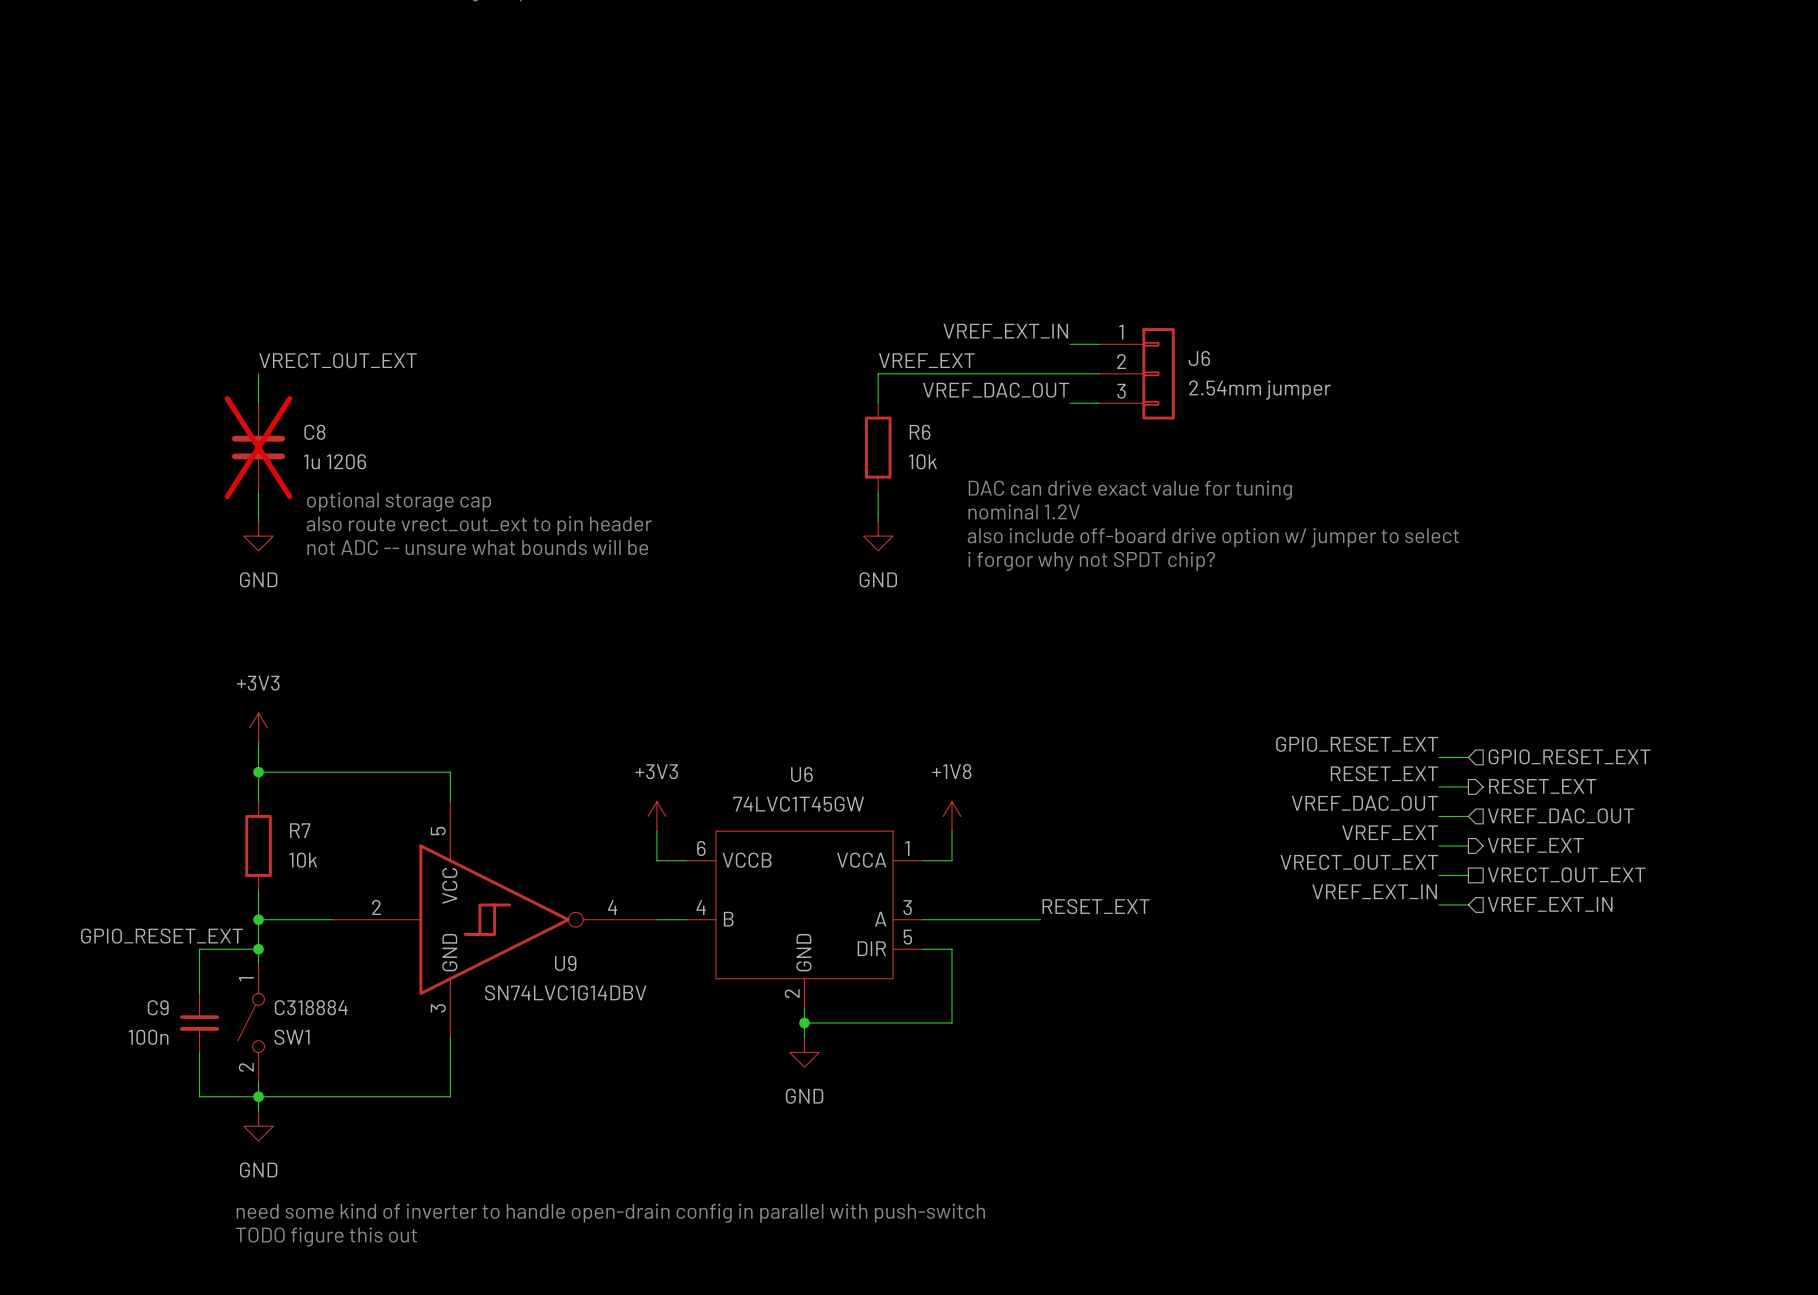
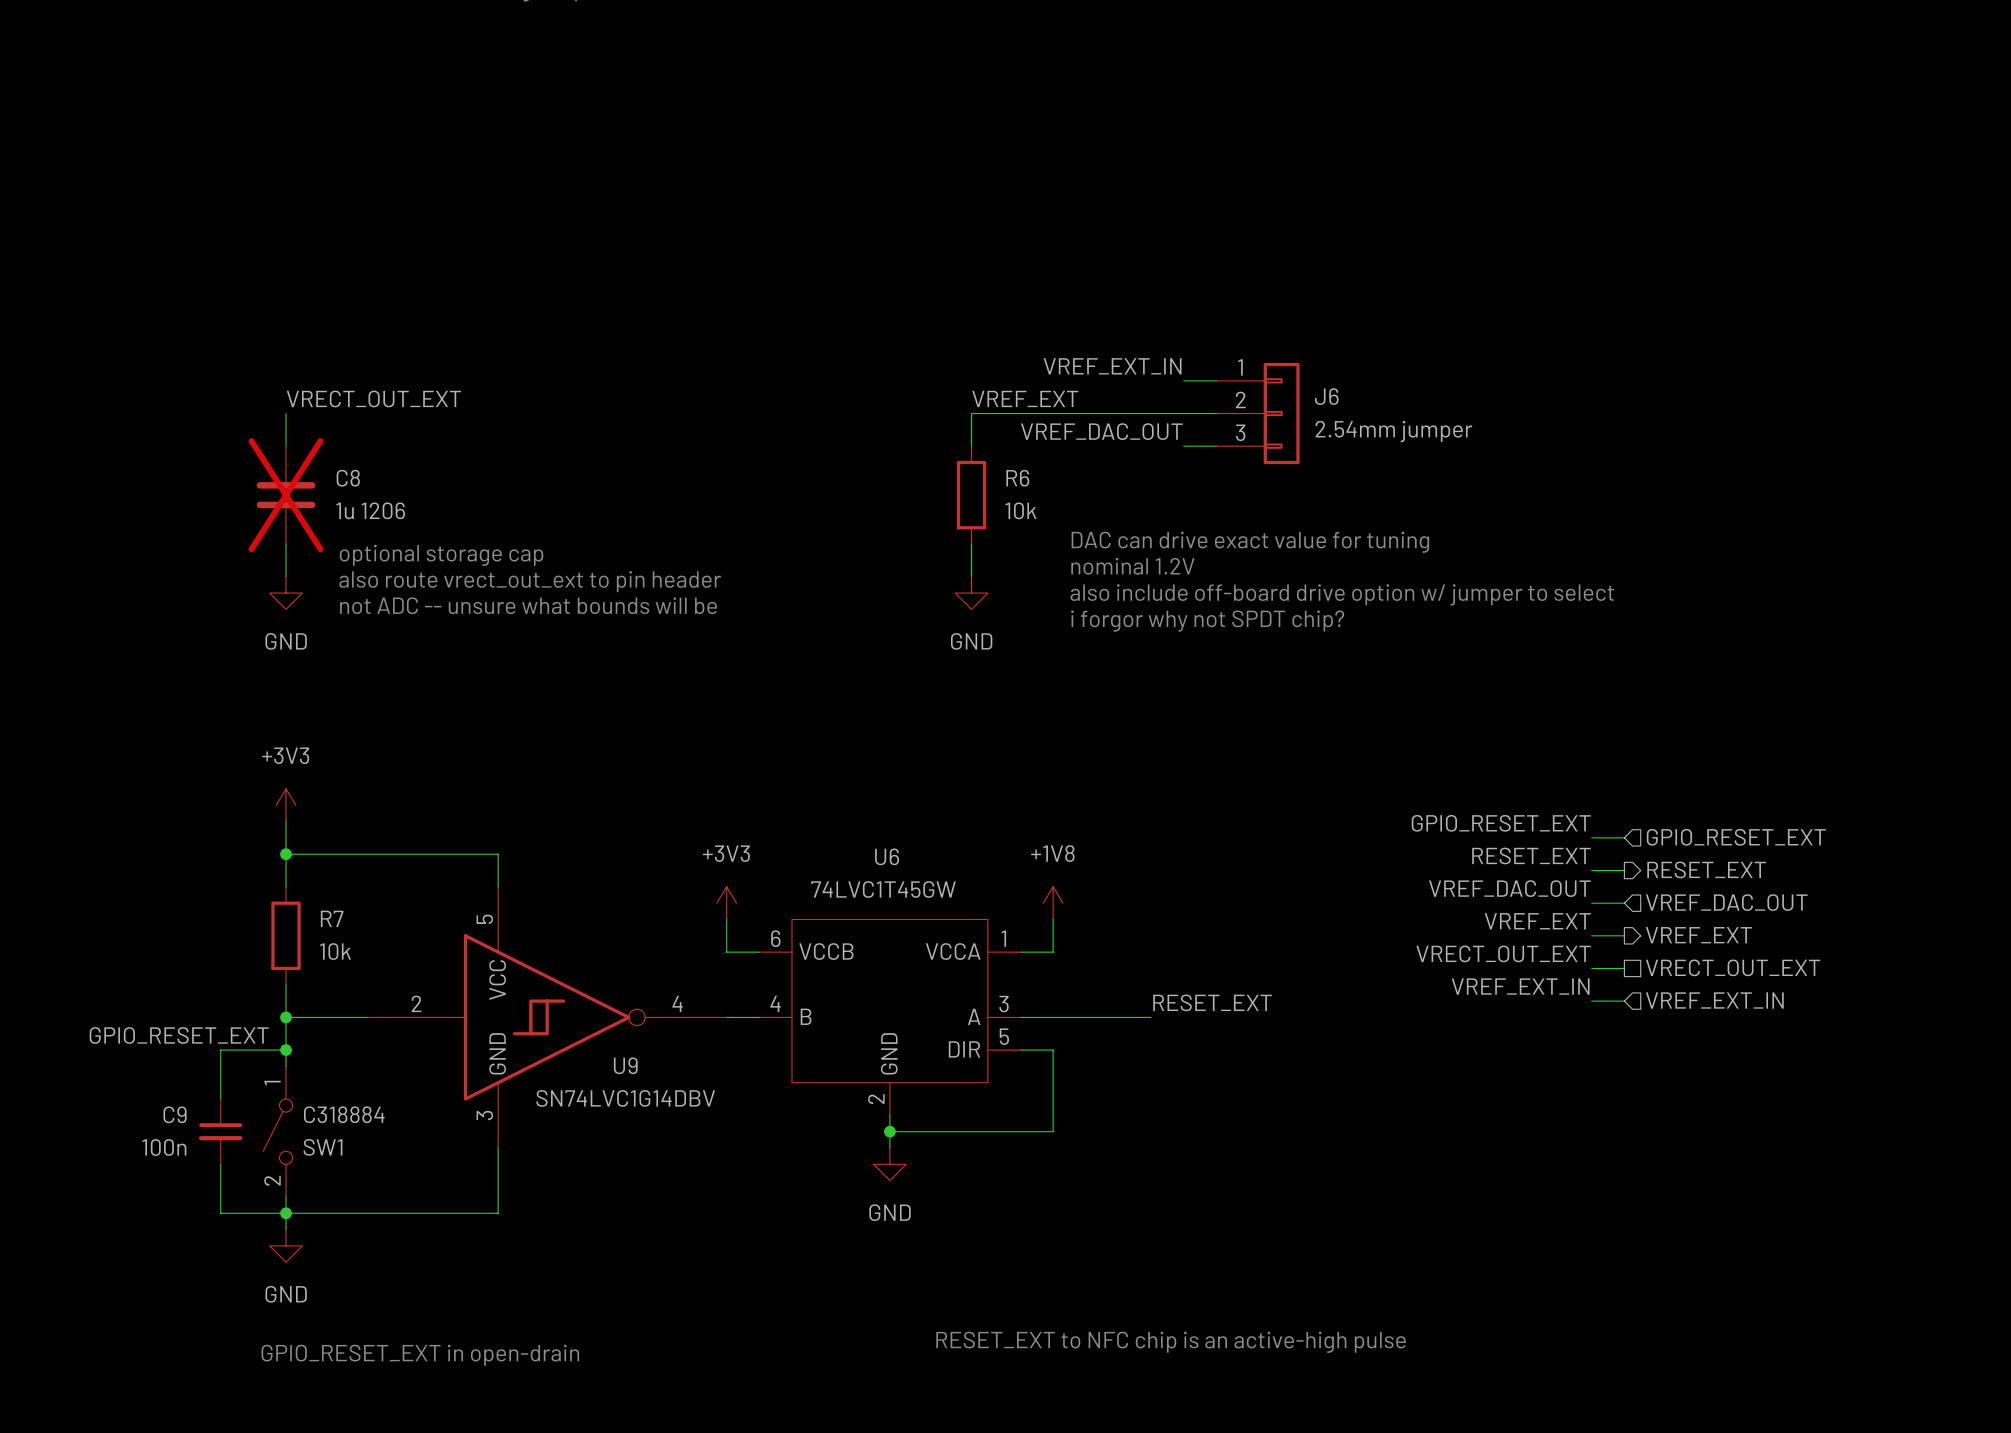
text: need some kind of inverter to handle open-drain config in parallel with push-switch (610, 1213) -> none
text: none -> RESET_EXT to NFC chip is an active-high pulse (1171, 1342)
text: none -> GPIO_RESET_EXT in open-drain (420, 1355)
text: TODO figure this out (326, 1237) -> none

